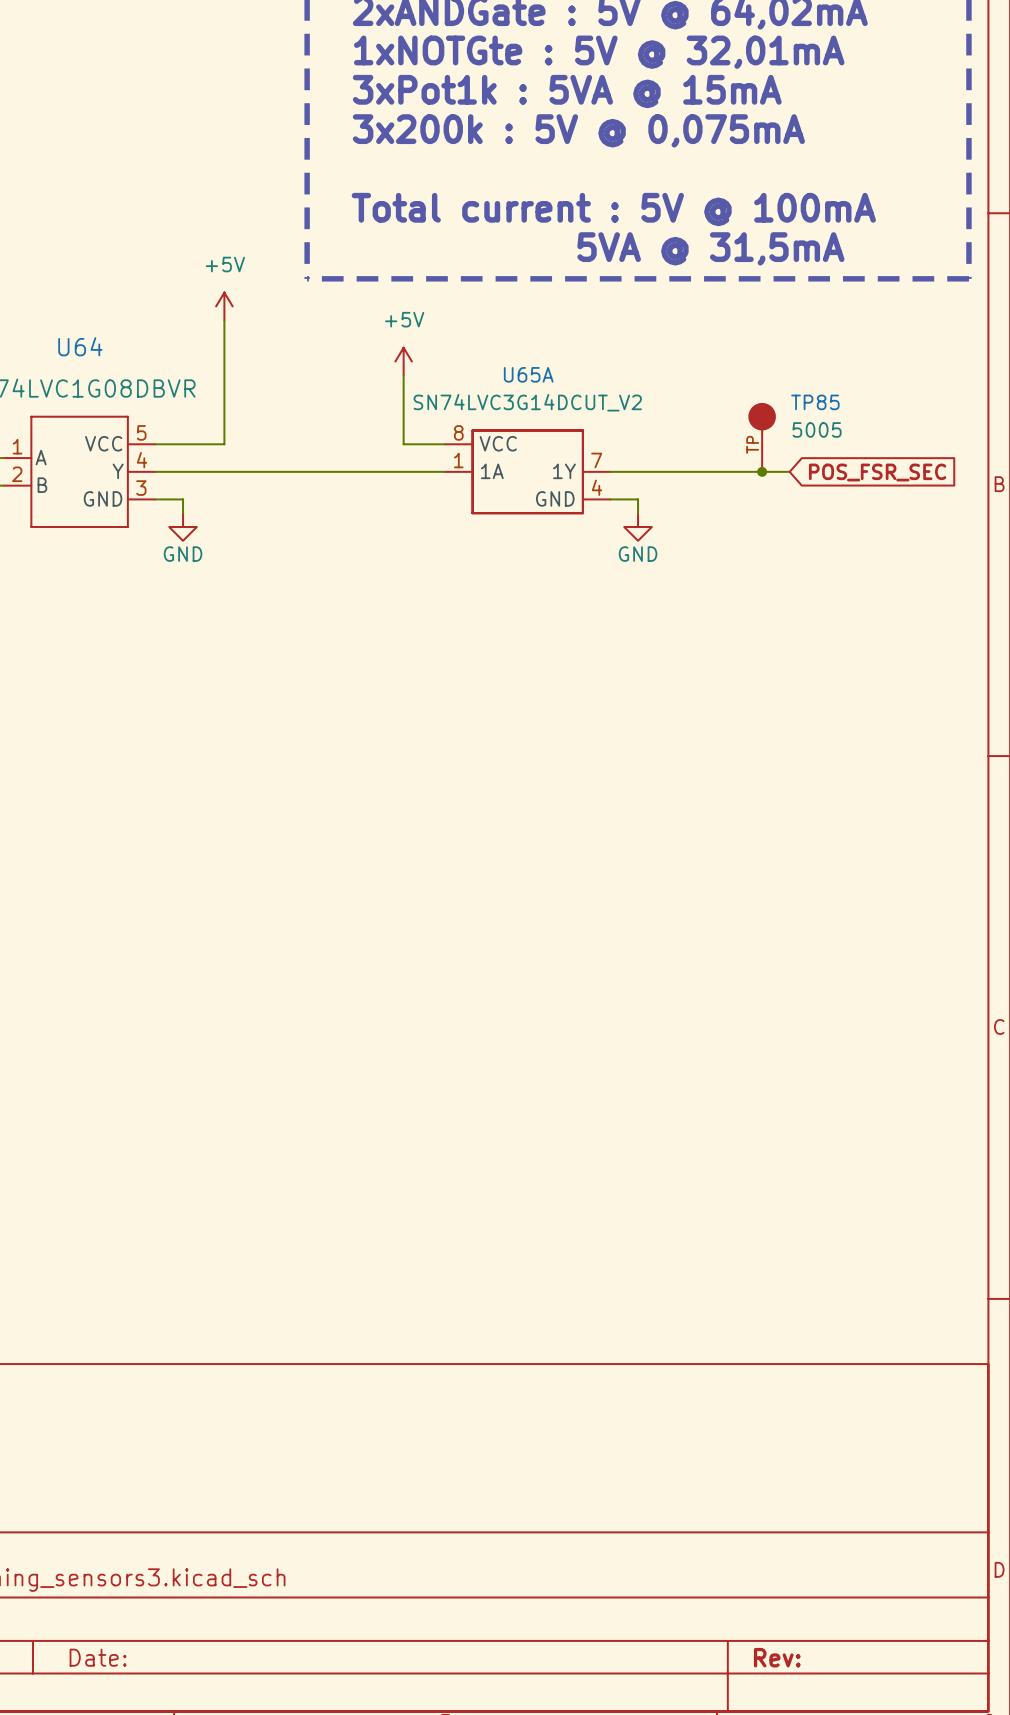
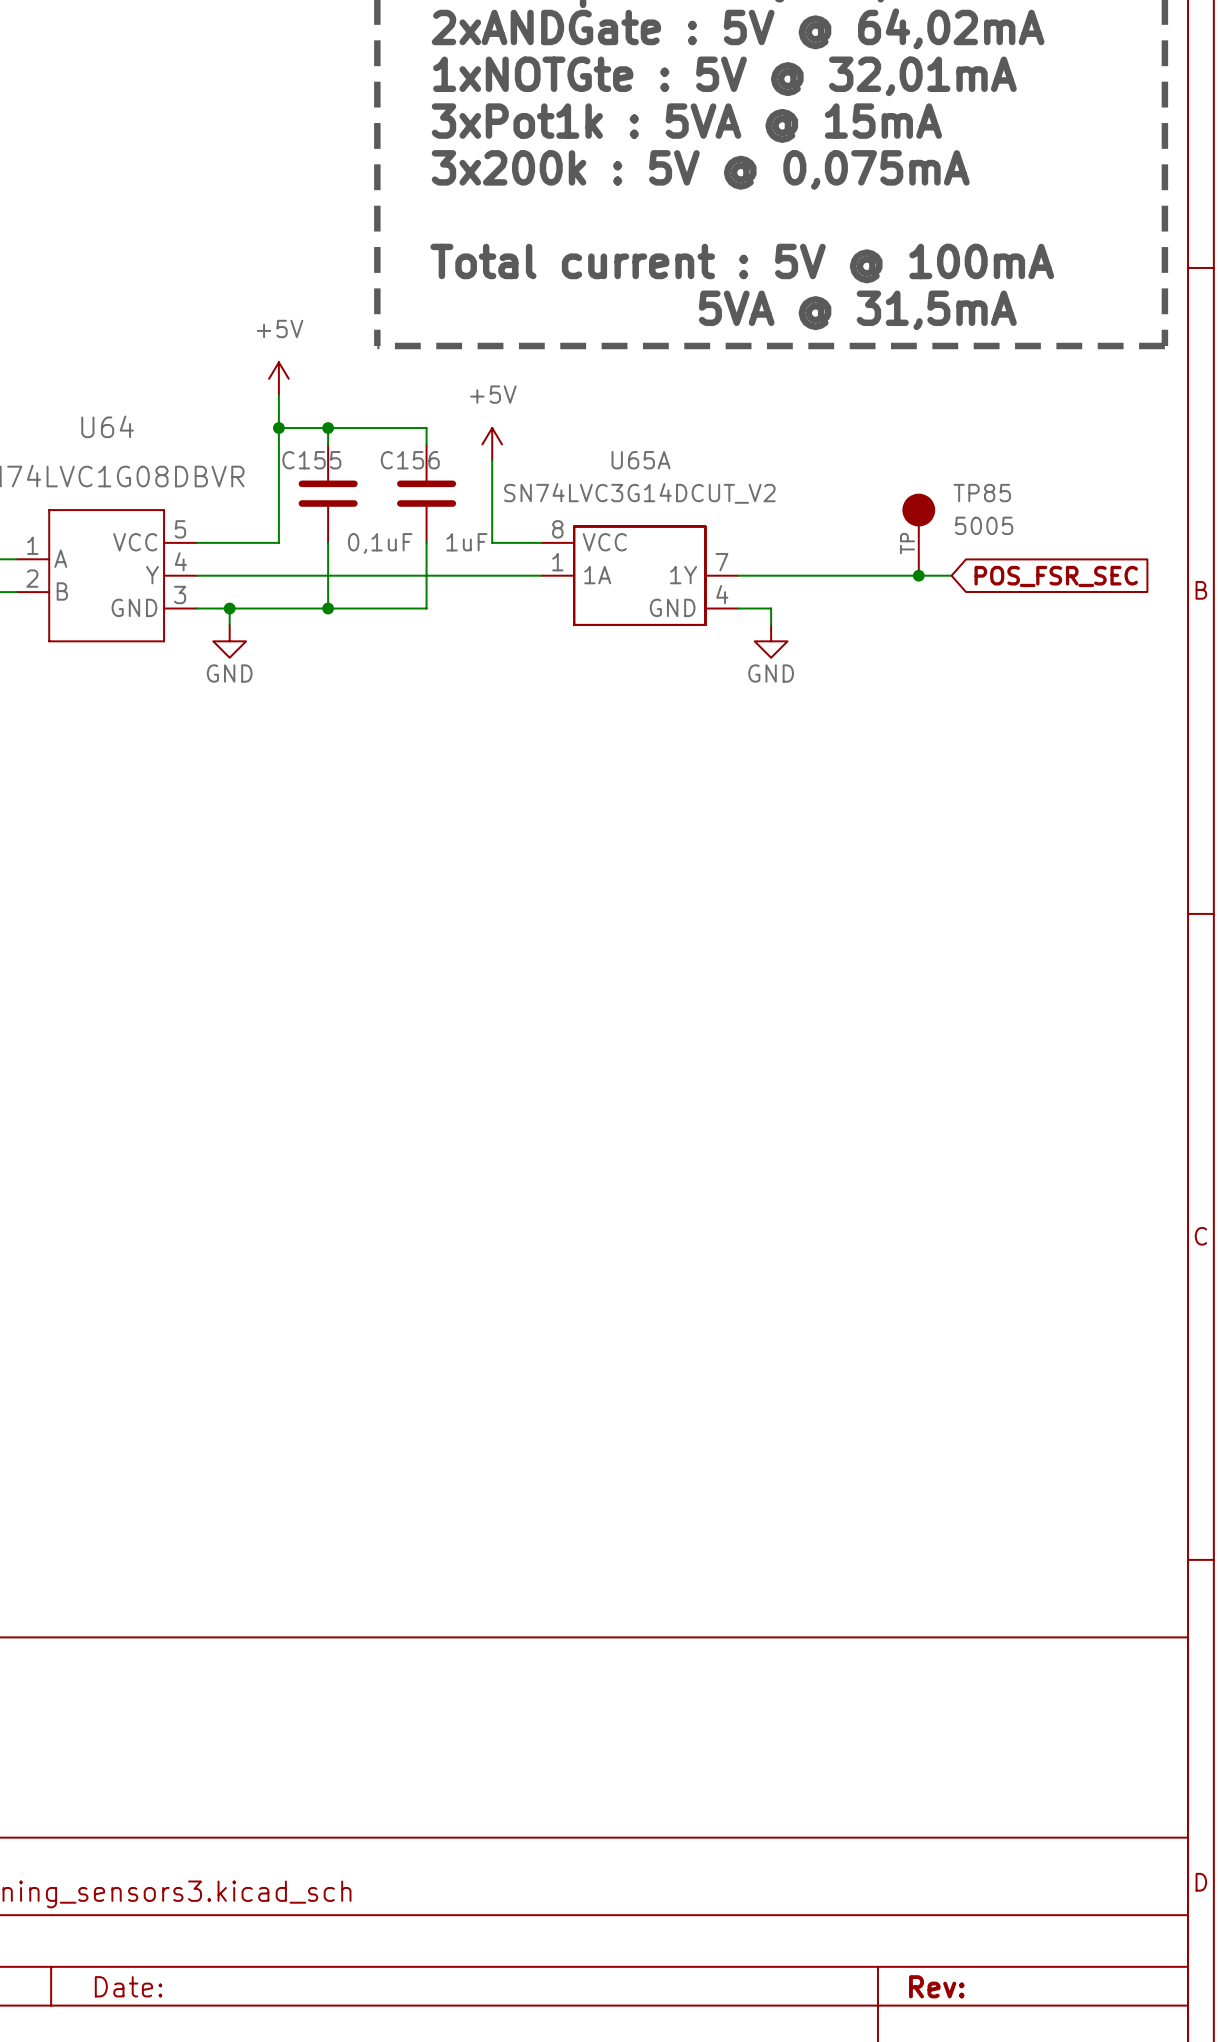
wire: none -> (278, 428) (426, 428) (426, 444)
junction: none -> (278, 428)
wire: none -> (328, 428) (328, 444)
junction: none -> (328, 428)
C155: none -> 0,1uF (328, 493)
C156: none -> 1uF (426, 493)
wire: none -> (328, 542) (328, 608)
wire: none -> (426, 542) (426, 608) (229, 608)
junction: none -> (229, 608)
junction: none -> (328, 608)

